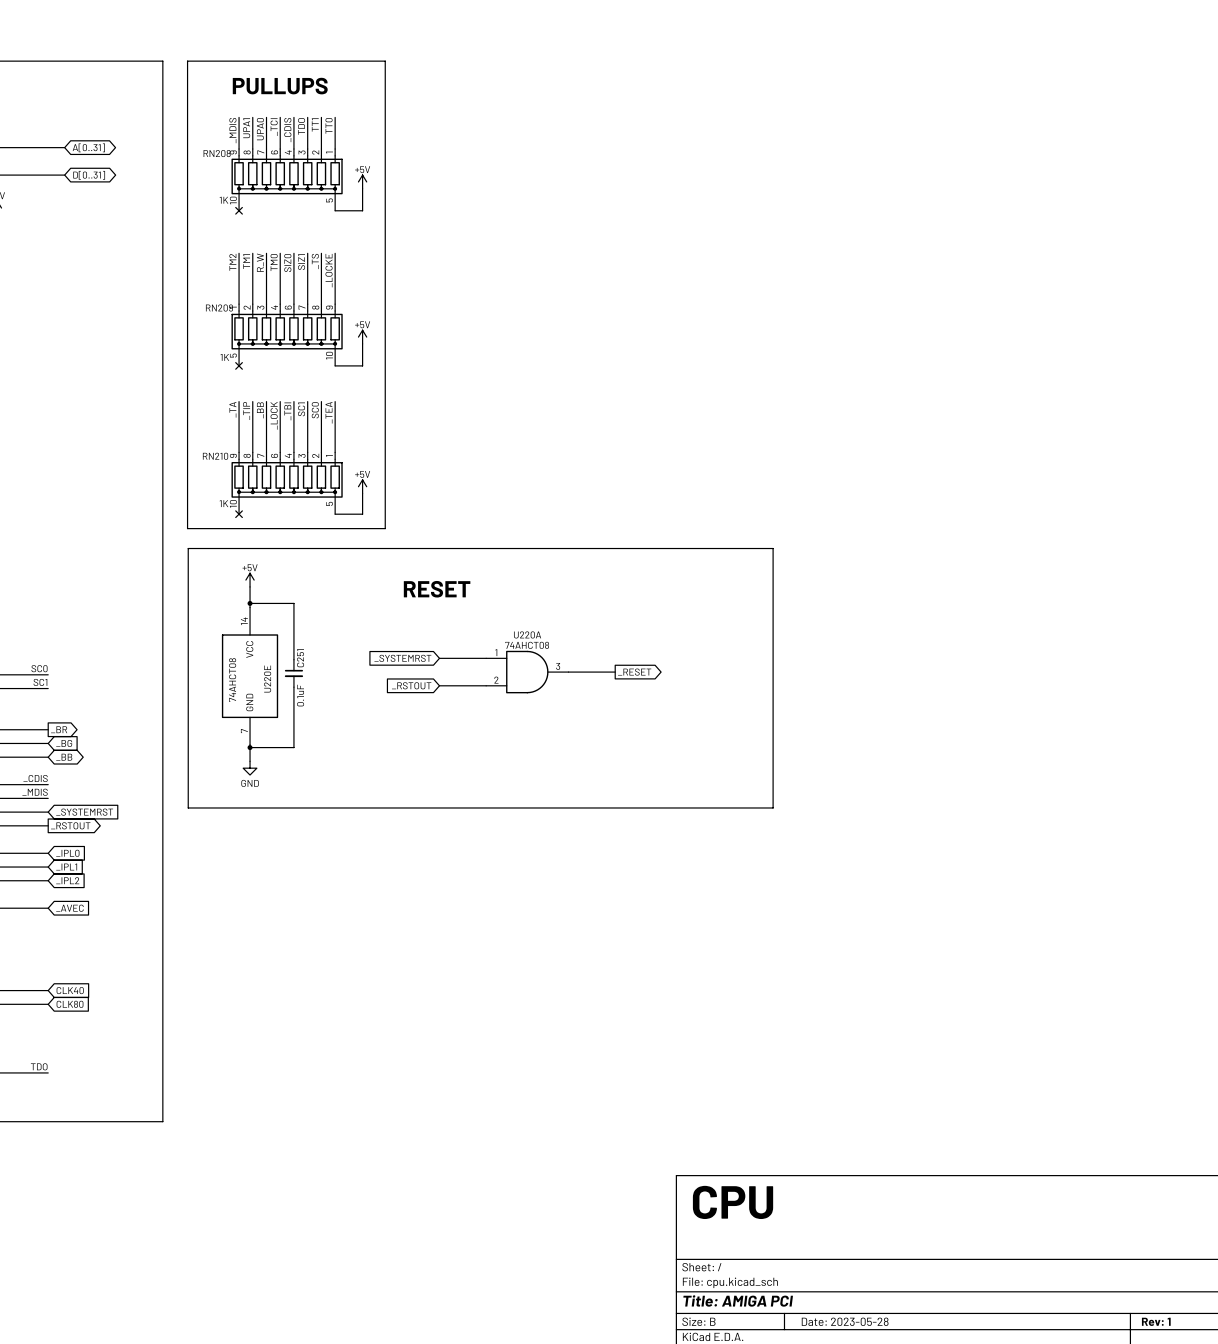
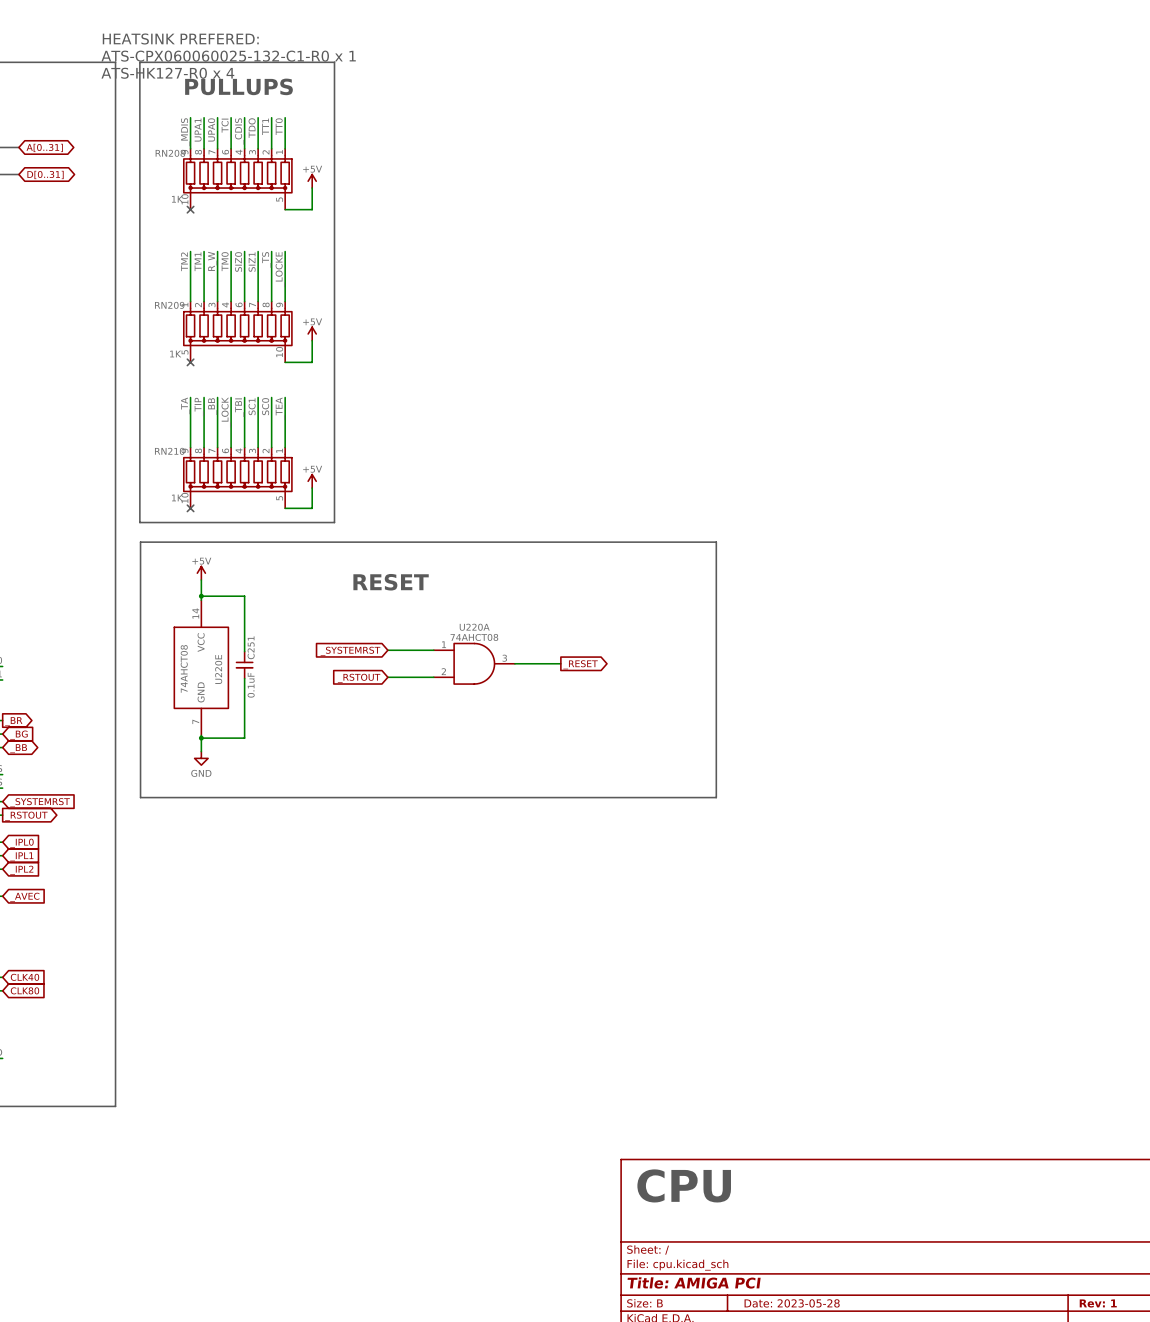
text: none -> HEATSINK PREFERED: (180, 38)
text: none -> ATS-CPX060060025-132-C1-R0 x 1 (228, 56)
text: none -> ATS-HK127-R0 x 4 (167, 73)

